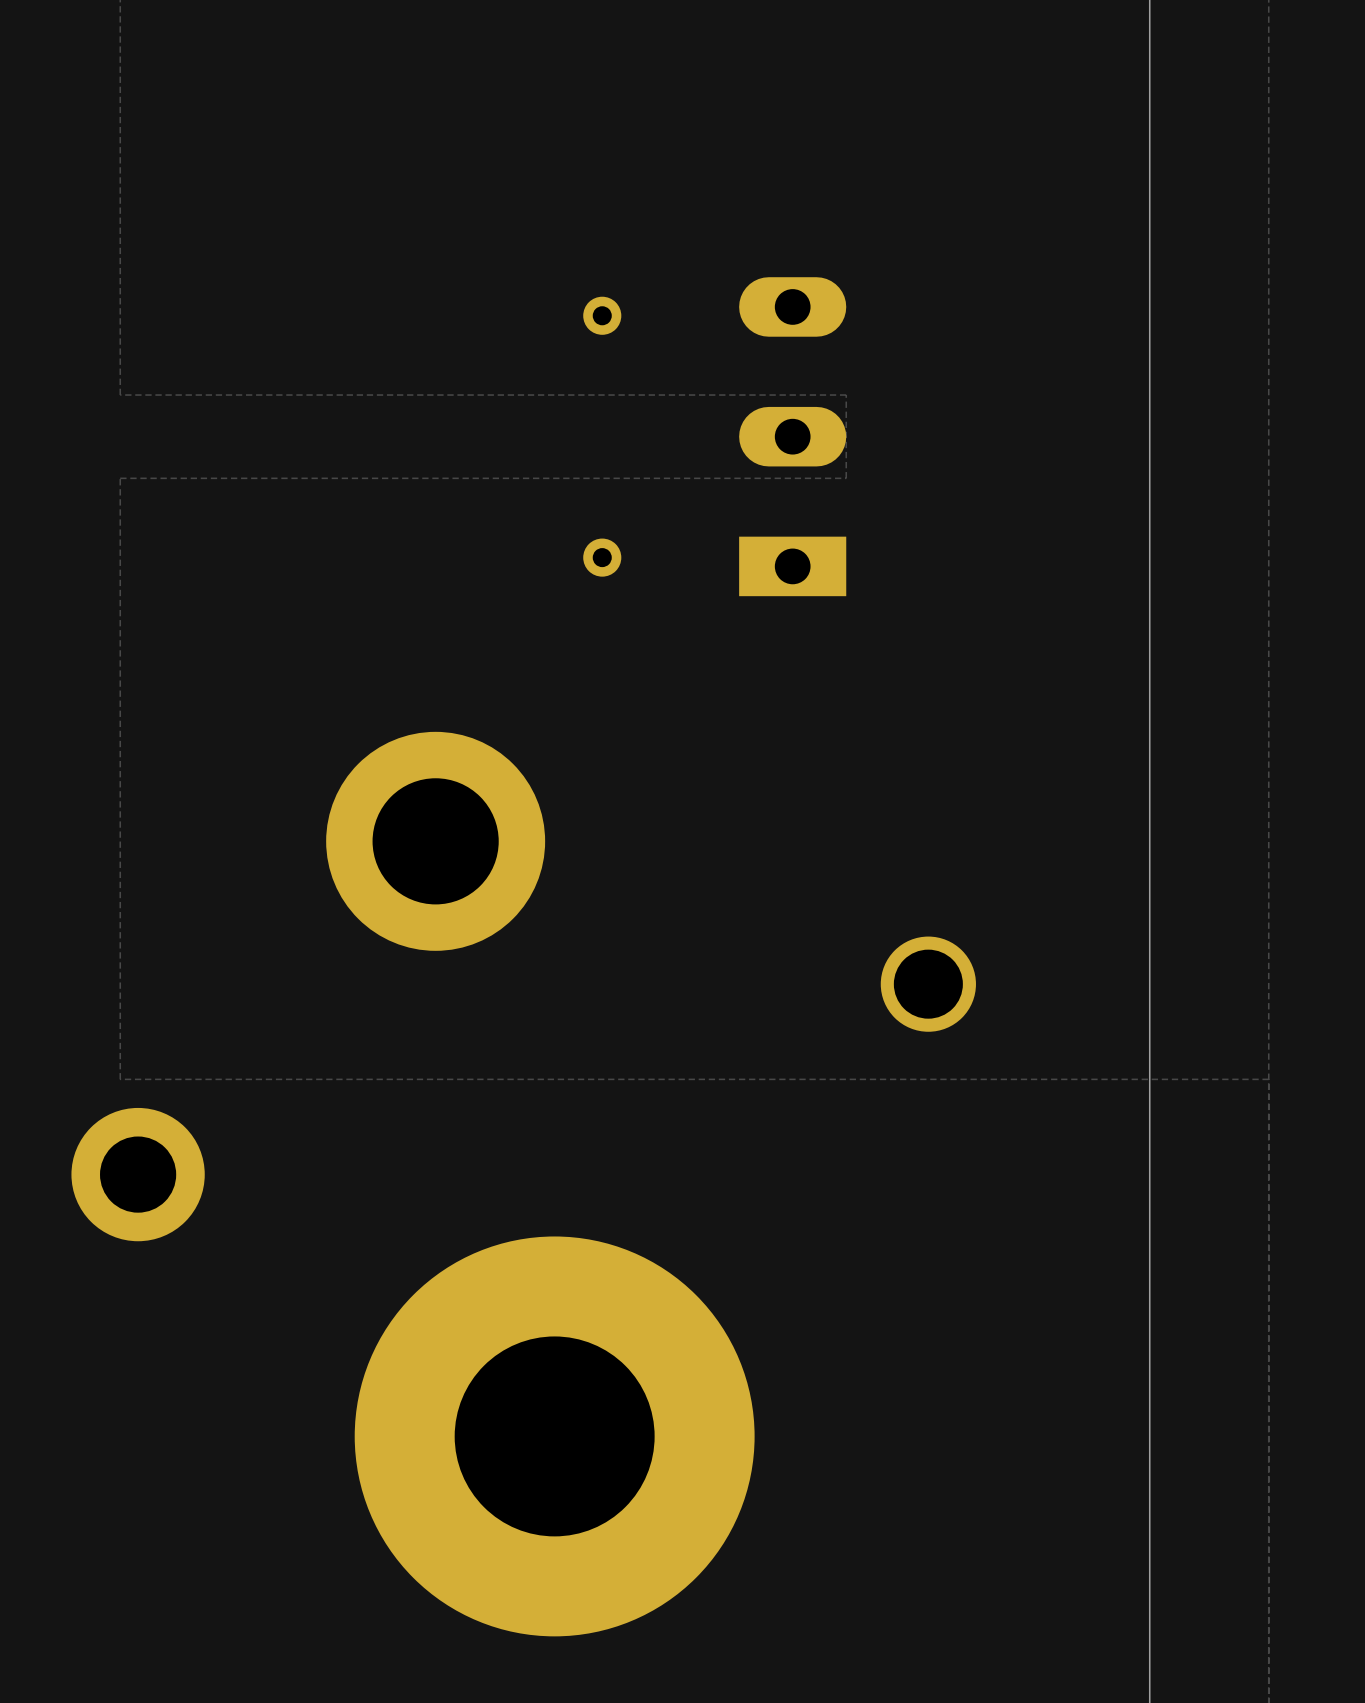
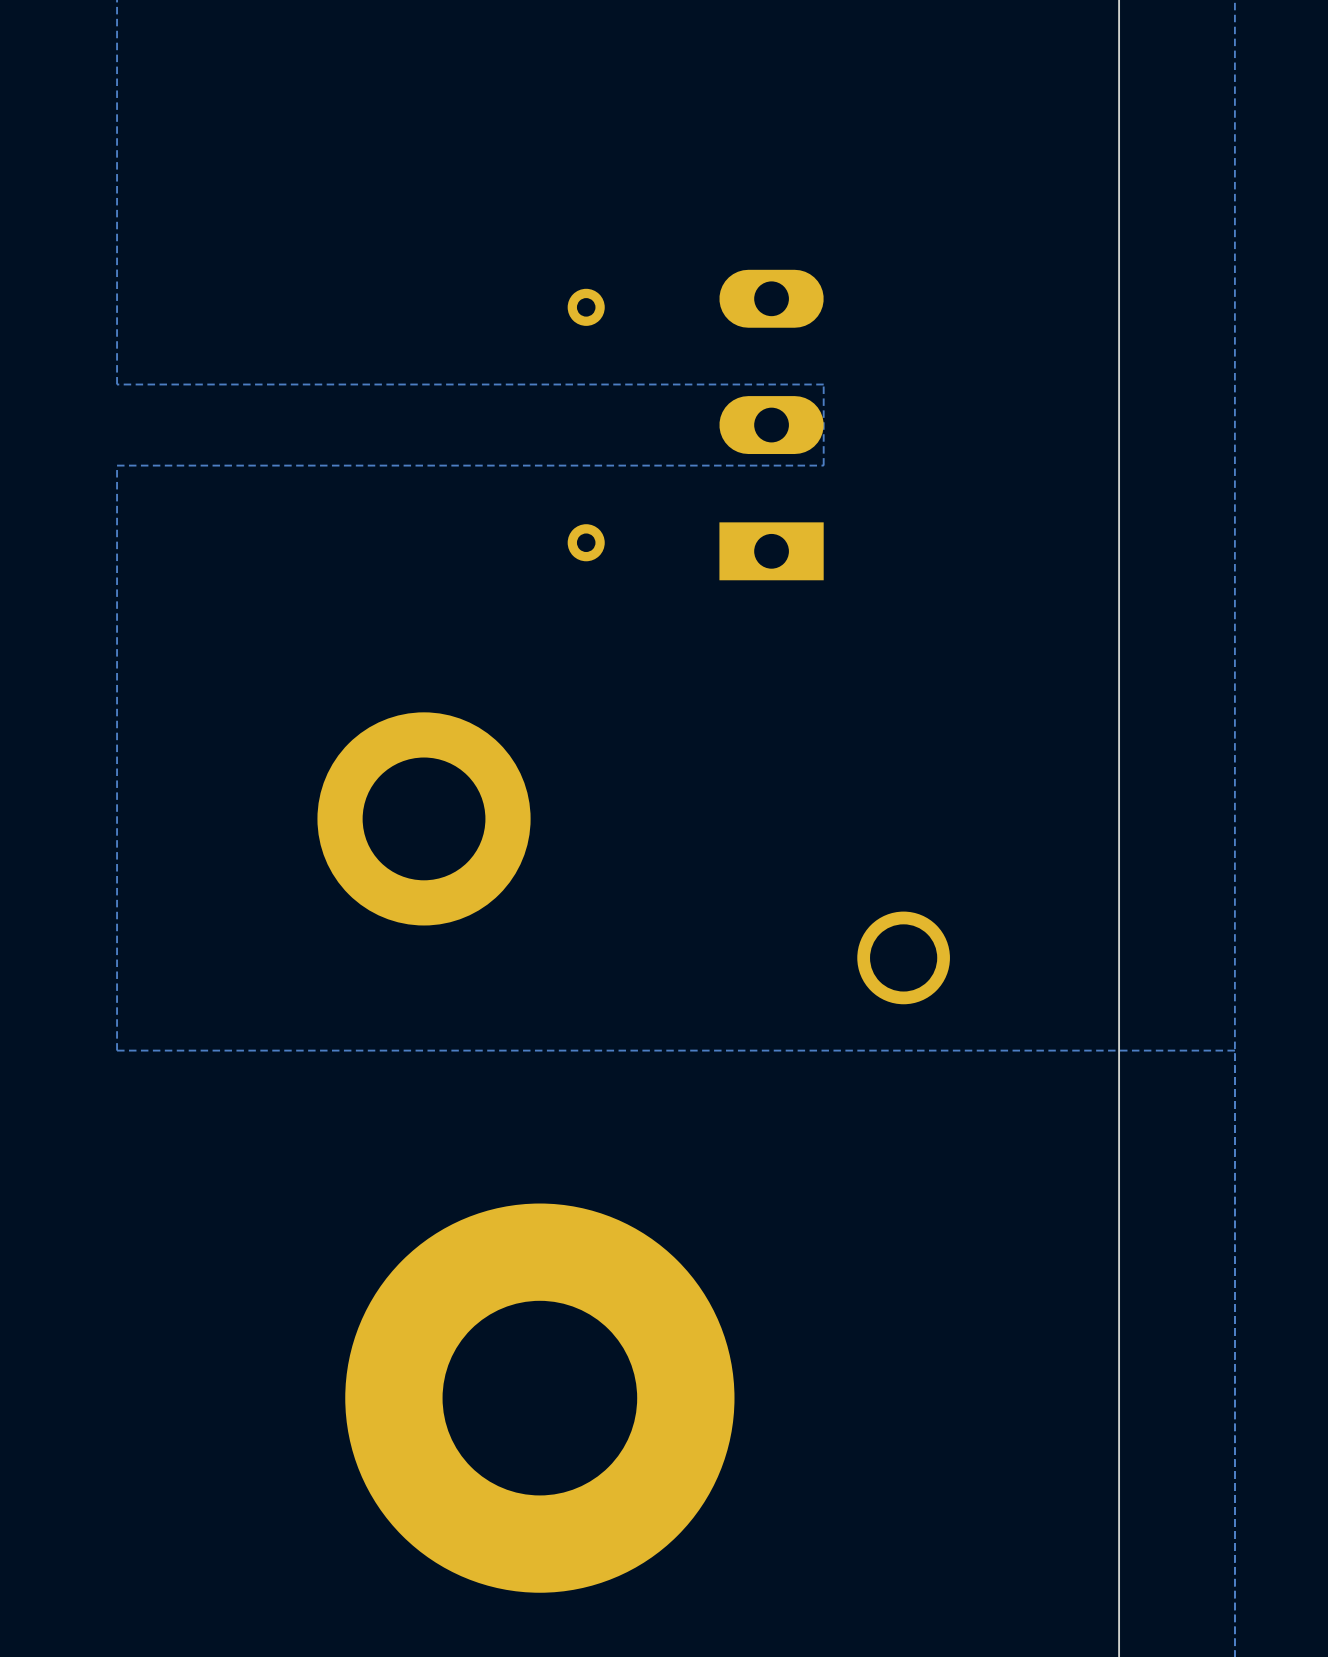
part: (138, 1174) -> none

